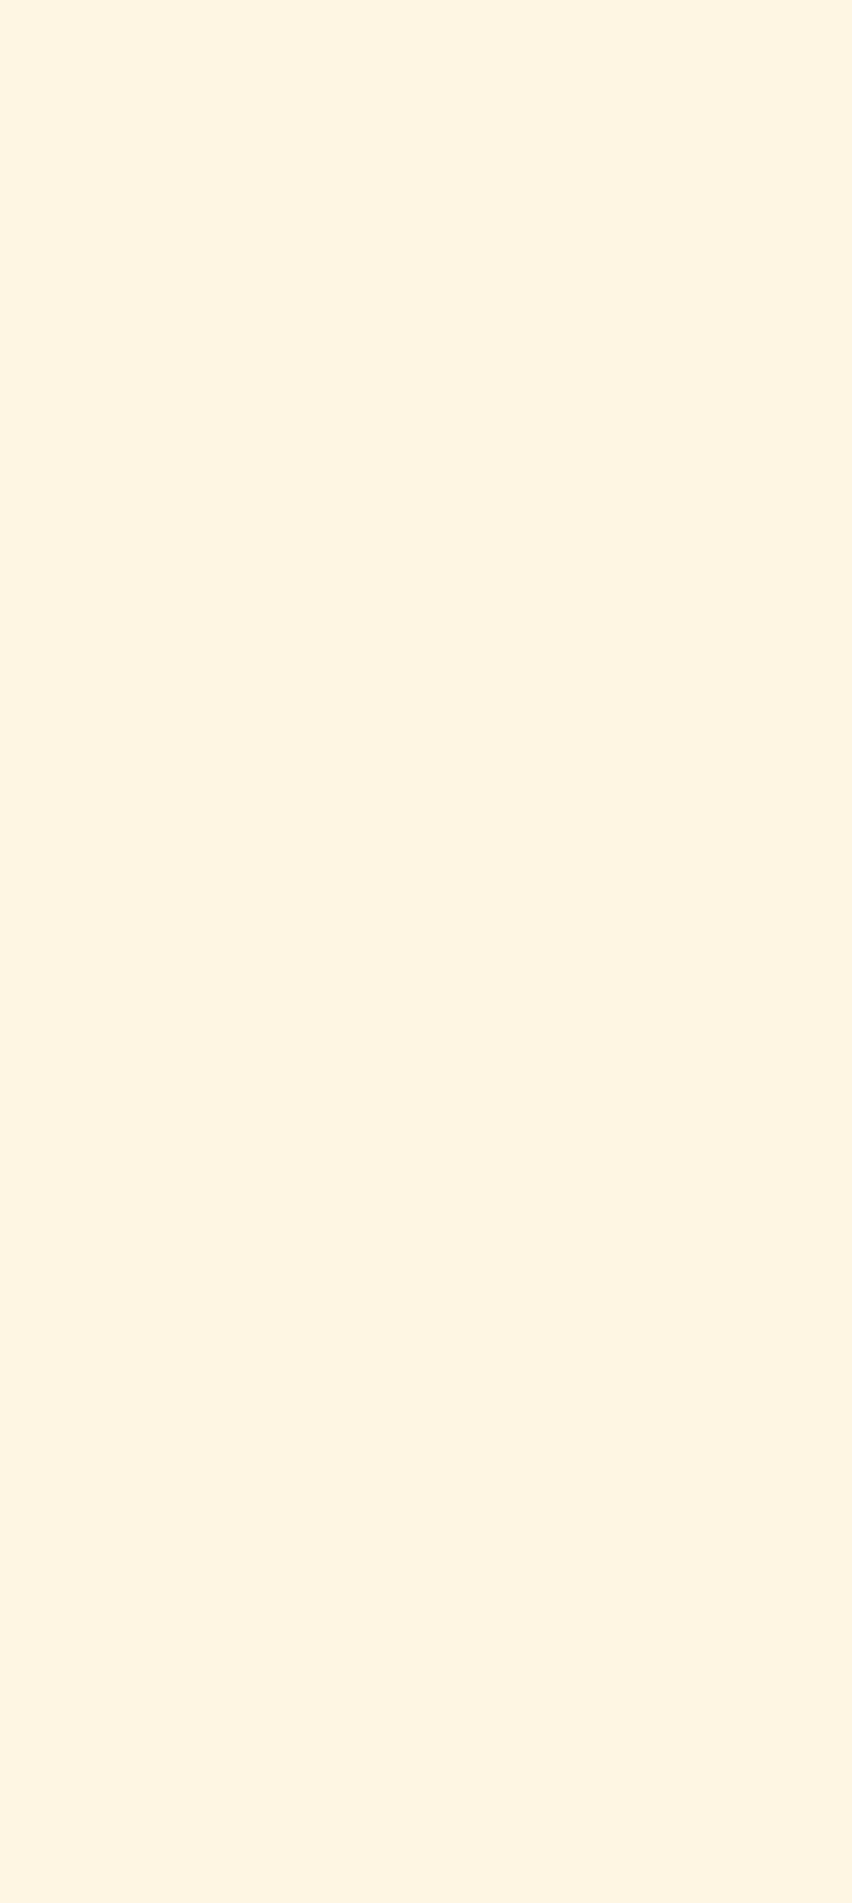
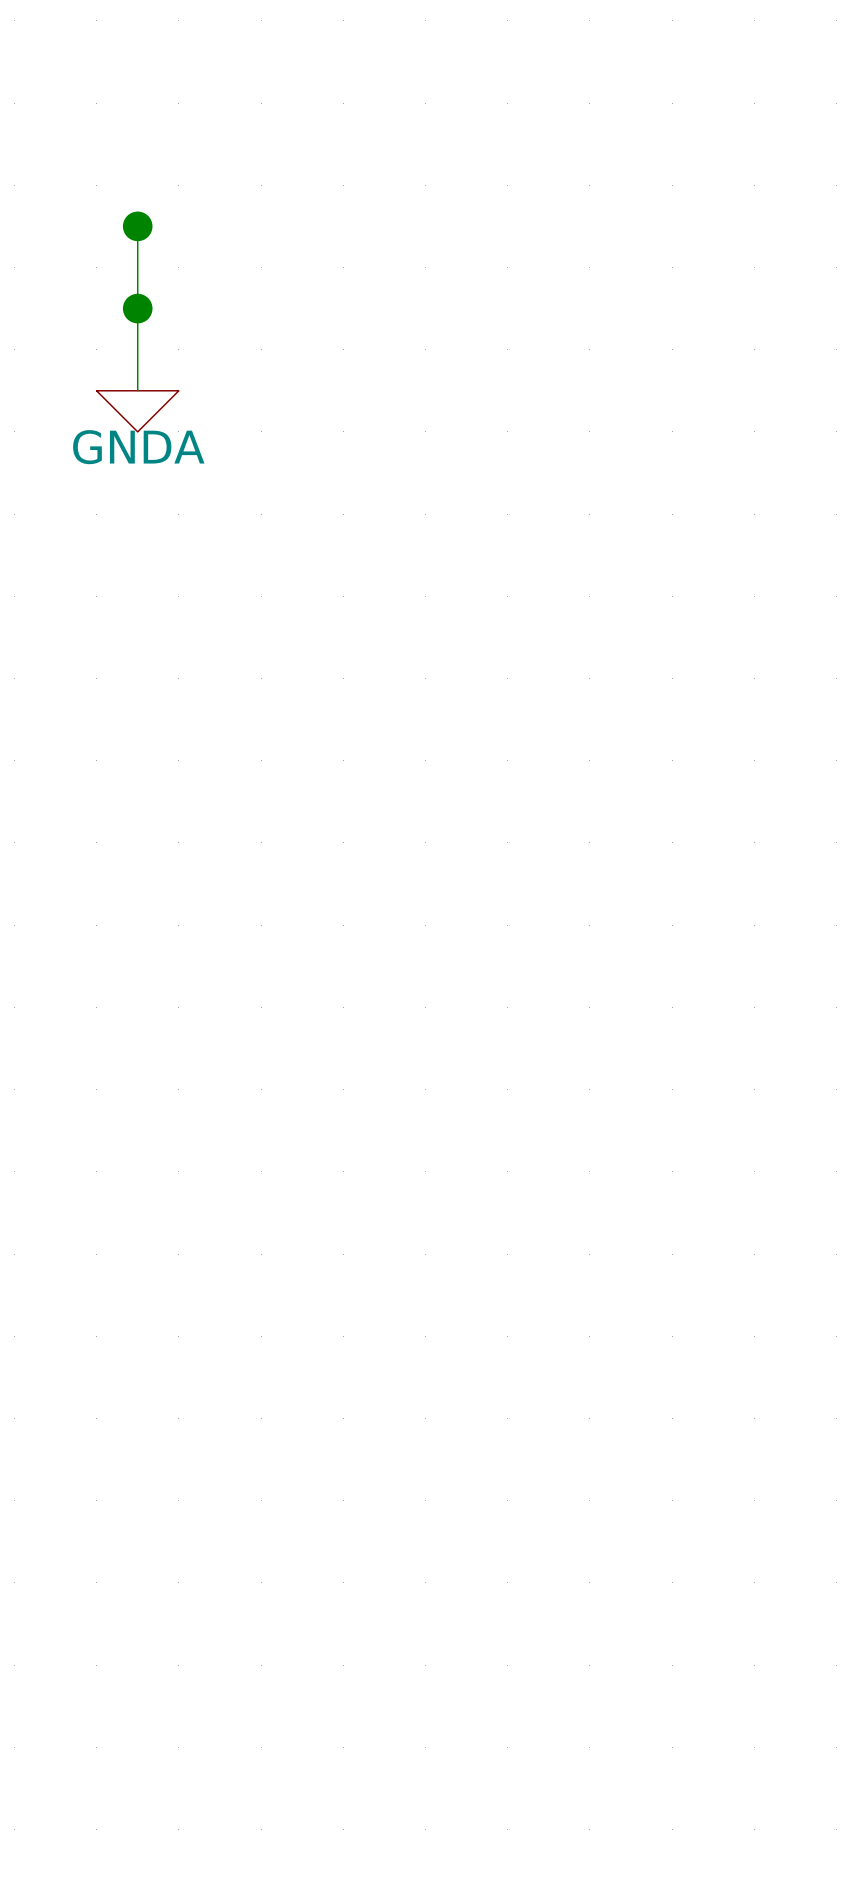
wire: none -> (137, 226) (137, 390)
junction: none -> (137, 226)
junction: none -> (137, 308)
power symbol: none -> GNDA (137, 411)

